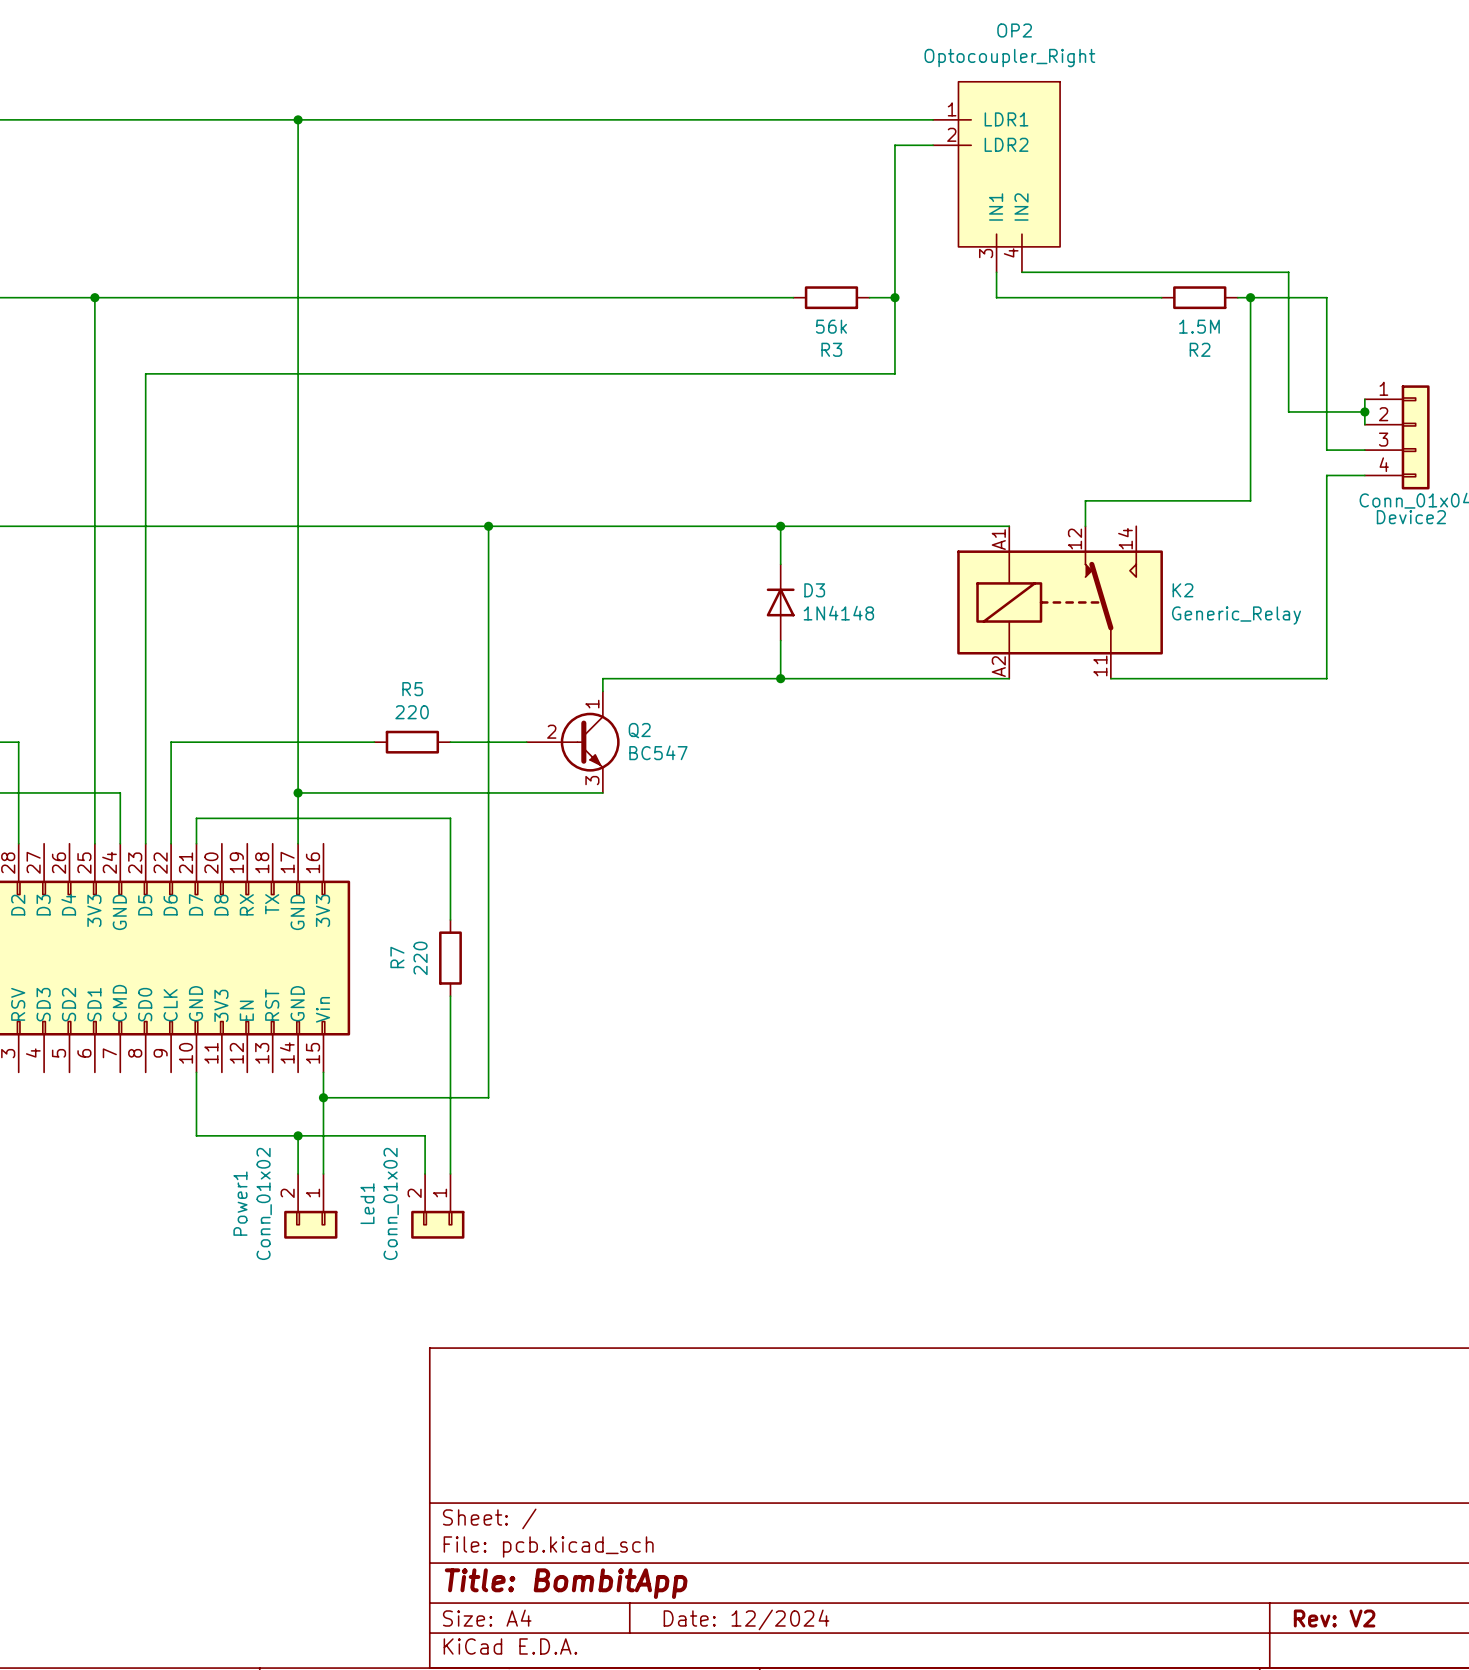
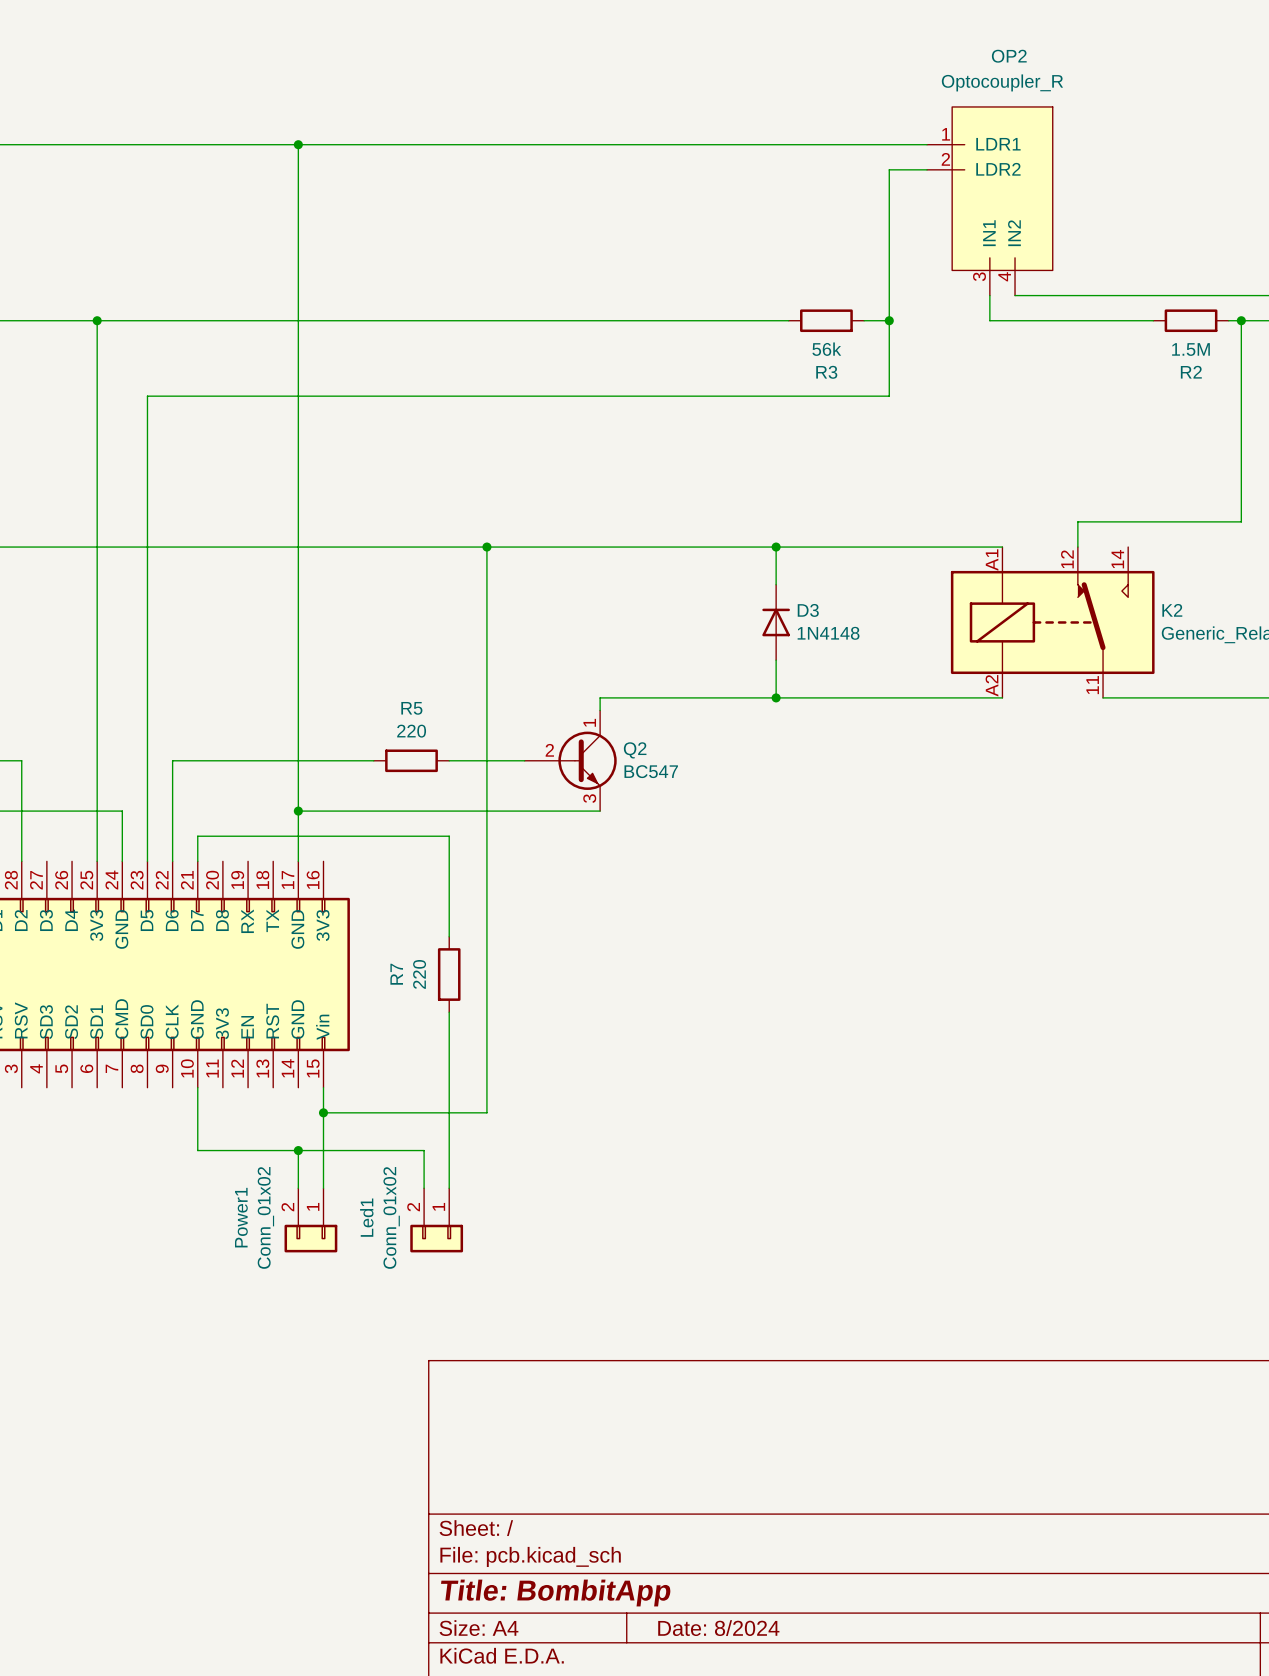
OP2 value: Optocoupler_Right (1009, 58) -> Optocoupler_R (1002, 82)
title block: Date: 12/2024 (746, 1619) -> Date: 8/2024 (718, 1628)

